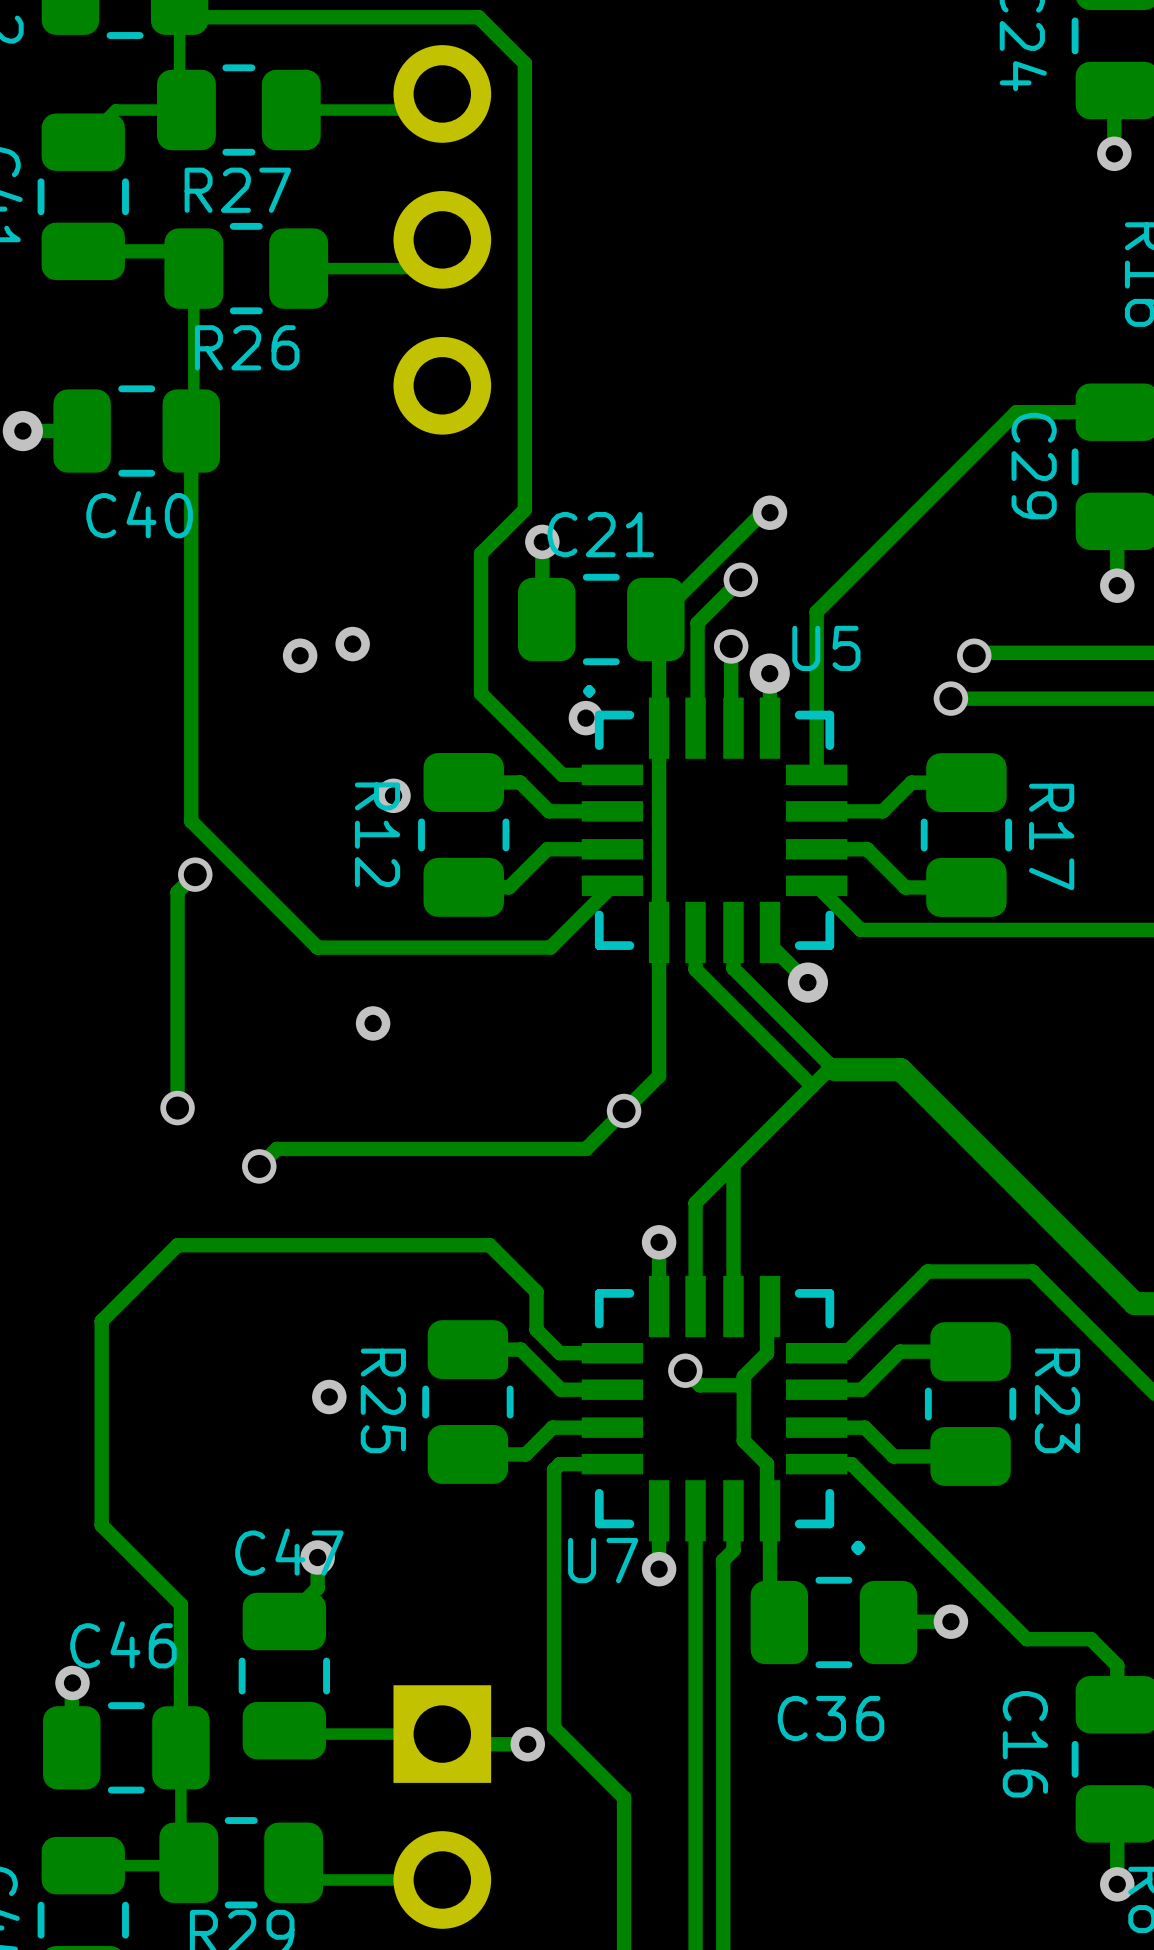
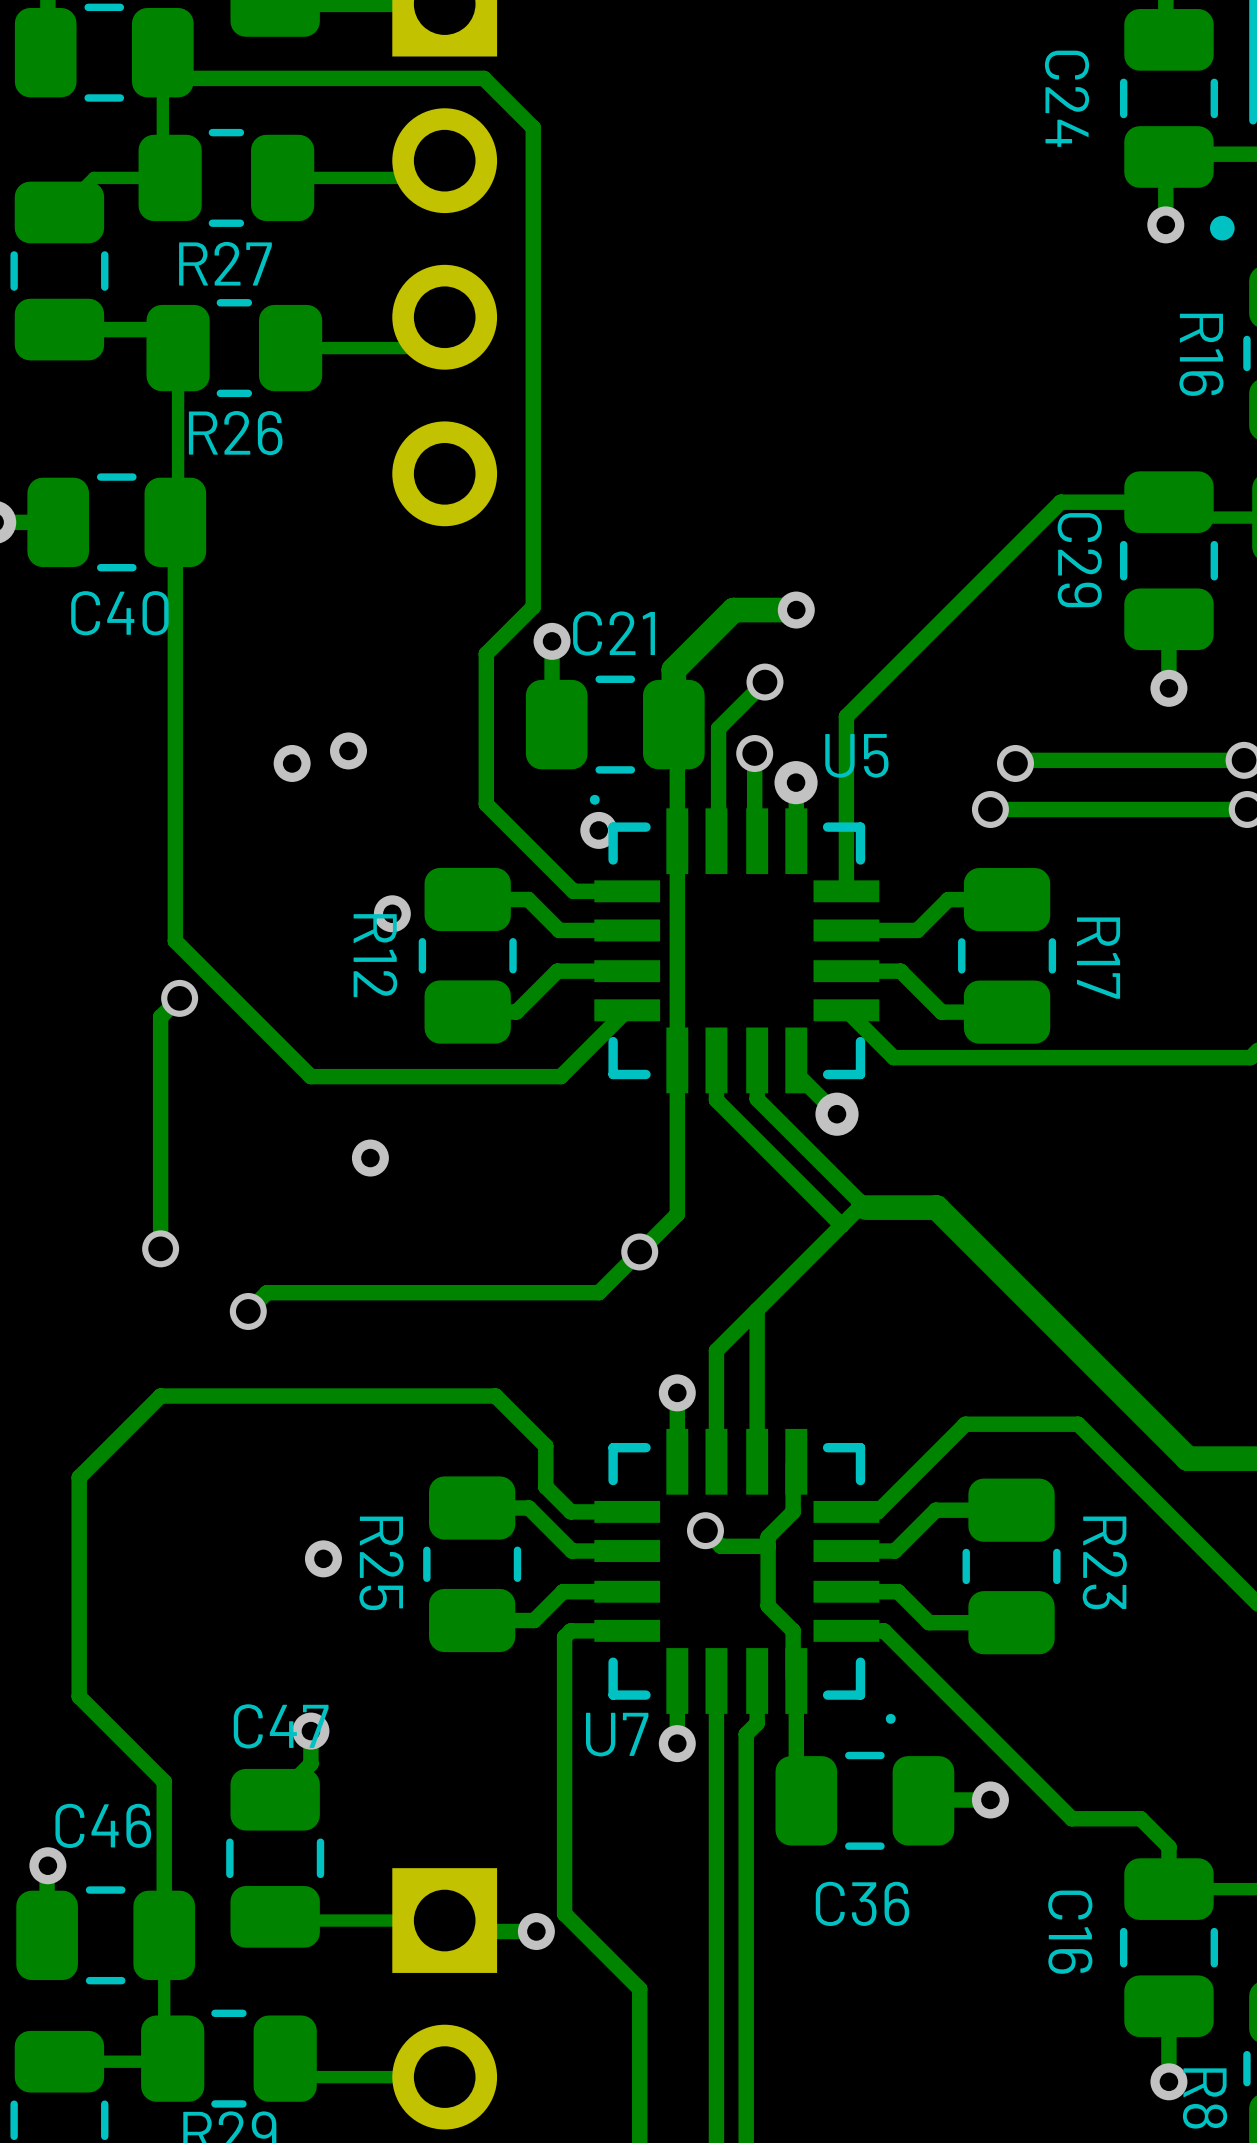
track: (762, 512) (655, 619) -> (788, 610) (733, 610) (673, 669) (673, 724)

